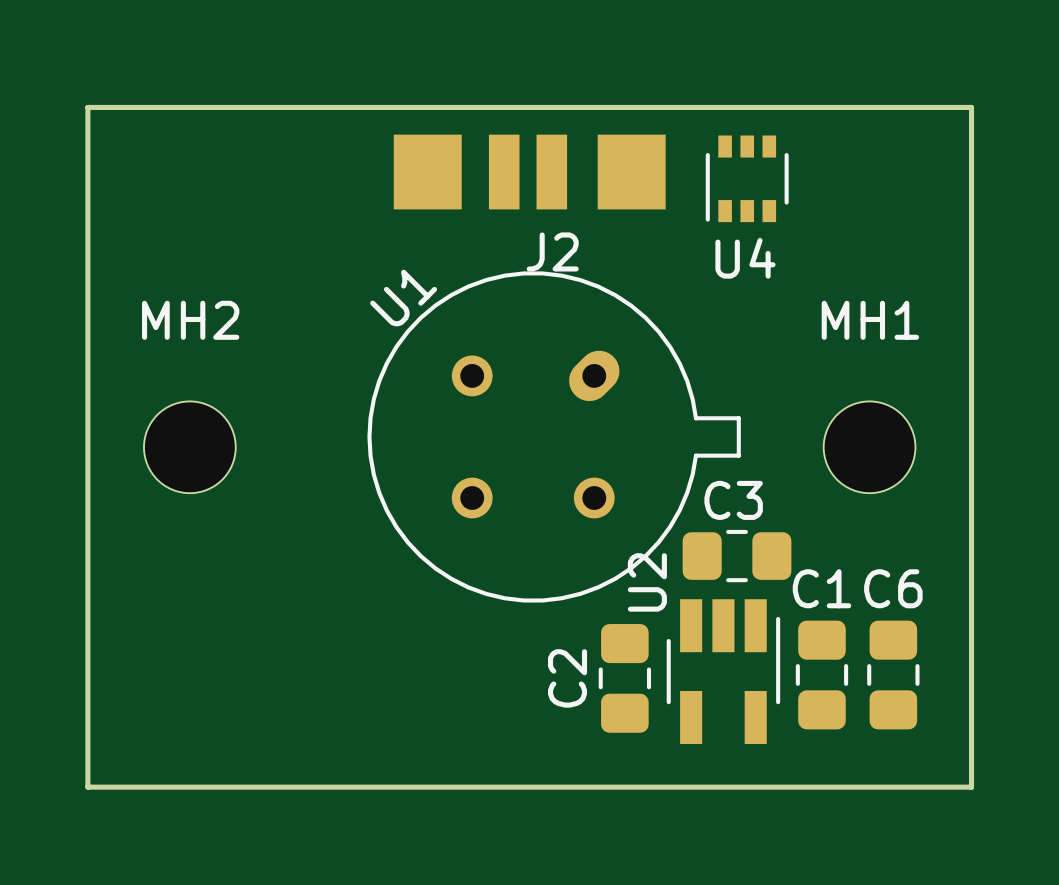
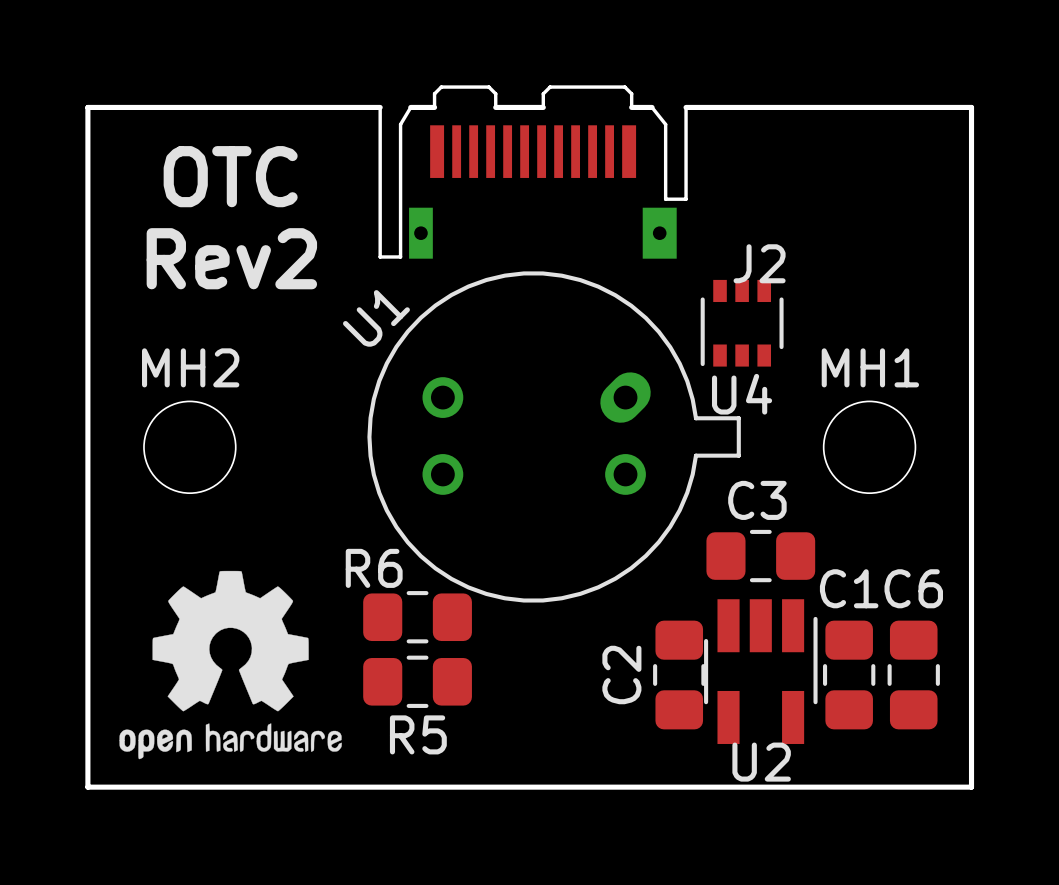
board edge: (380, 107) (410, 107) -> (380, 107) (380, 256) (400, 256) (400, 124) (410, 107)
board edge: (434, 107) (495, 107) -> (434, 107) (434, 93) (441, 87) (488, 87) (495, 93) (495, 107)
board edge: (543, 107) (631, 107) -> (543, 107) (543, 93) (550, 87) (624, 87) (631, 93) (631, 107)
board edge: (652, 107) (686, 107) -> (652, 107) (665, 124) (665, 199) (686, 199) (686, 107)
J2 footprint: [393, 134, 666, 210] -> [409, 125, 677, 259]
text: none -> OTC (230, 176)
U4 position: (747, 178) -> (742, 323)
J2 name position: J2 (552, 251) -> J2 (759, 263)
text: none -> Rev2 (231, 258)
U4 name position: U4 (745, 258) -> U4 (742, 394)
U1 footprint: [367, 271, 741, 603] -> [367, 271, 741, 603]
MH2 name position: MH2 (190, 320) -> MH2 (190, 367)
MH1 name position: MH1 (870, 320) -> MH1 (870, 367)
C3 position: (737, 556) -> (760, 556)
drawing: none -> [119, 570, 342, 760]
U2 name rotation: 0° (647, 582) -> 90° clockwise (761, 762)
U2 name position: U2 (647, 582) -> U2 (761, 762)
R6: none -> (417, 617)
U2 position: (723, 671) -> (760, 671)
C1 position: (821, 675) -> (849, 675)
C6 position: (893, 675) -> (913, 675)
C2 position: (624, 678) -> (679, 675)
R5: none -> (417, 681)

